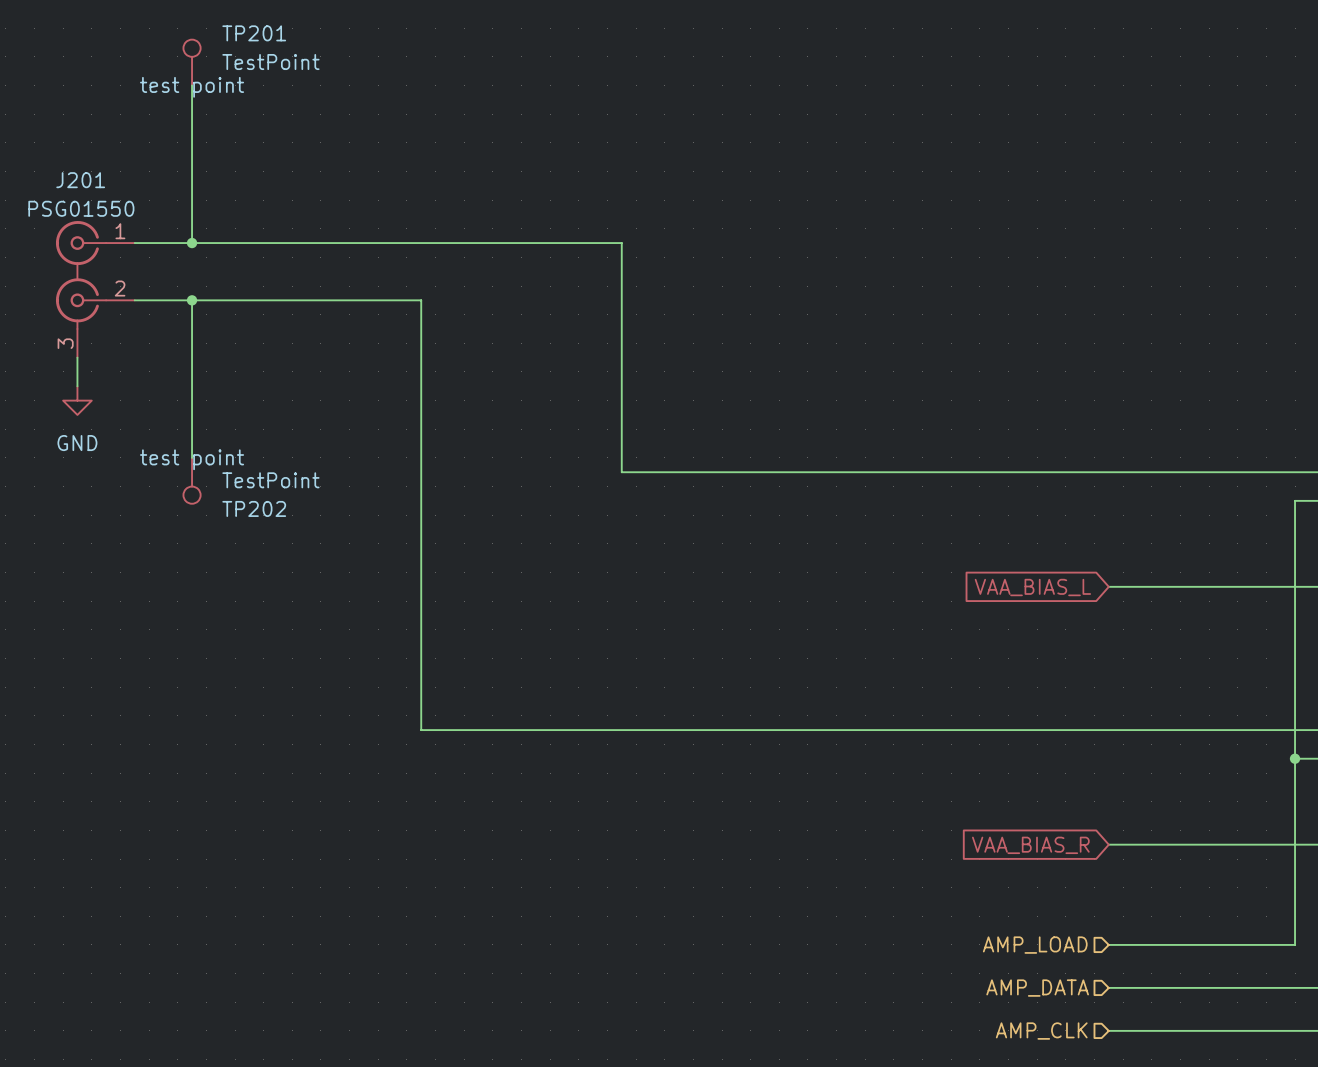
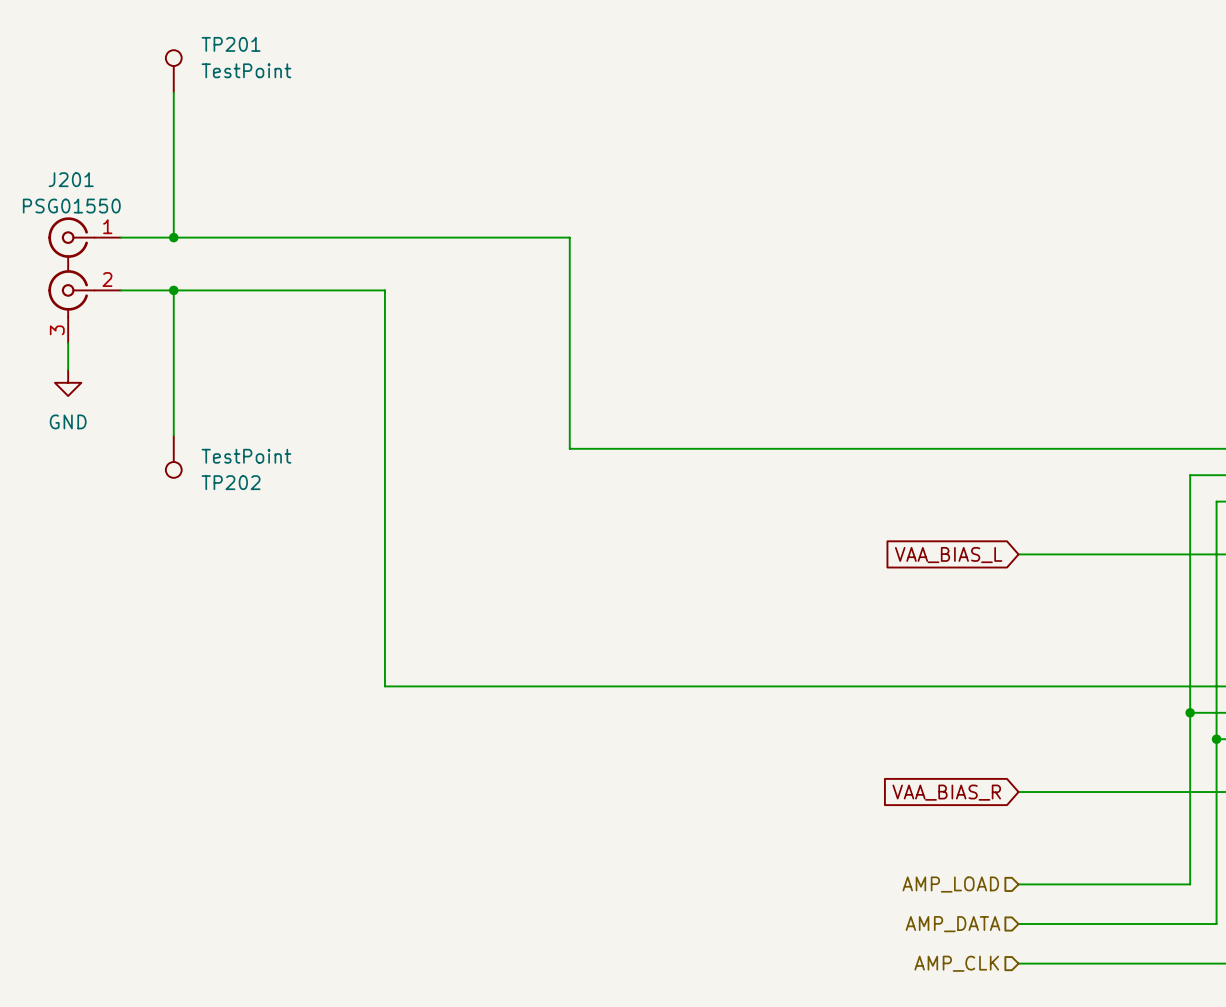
TP201 text: test point (192, 87) -> none
TP202 text: test point (192, 459) -> none

